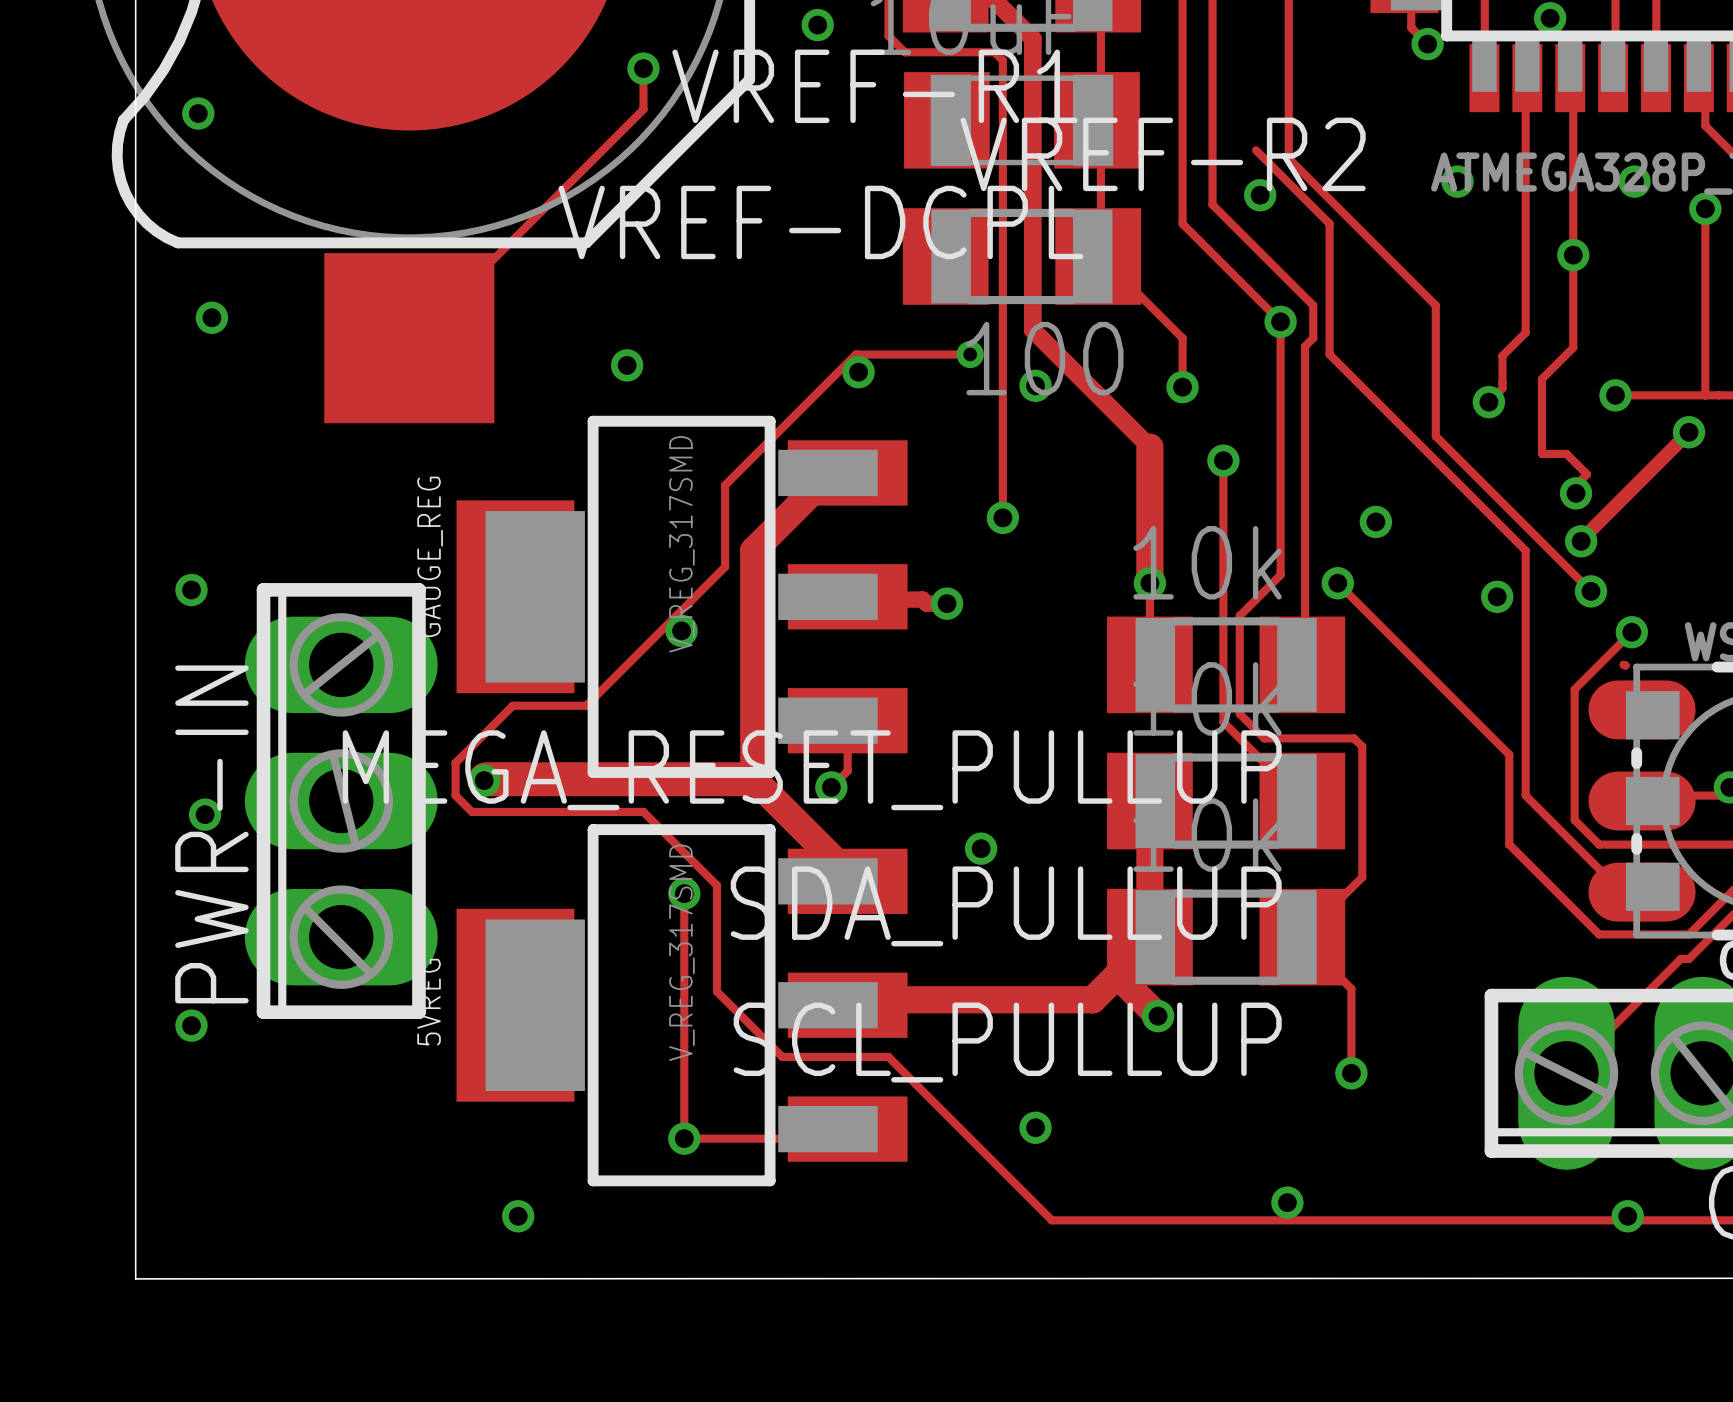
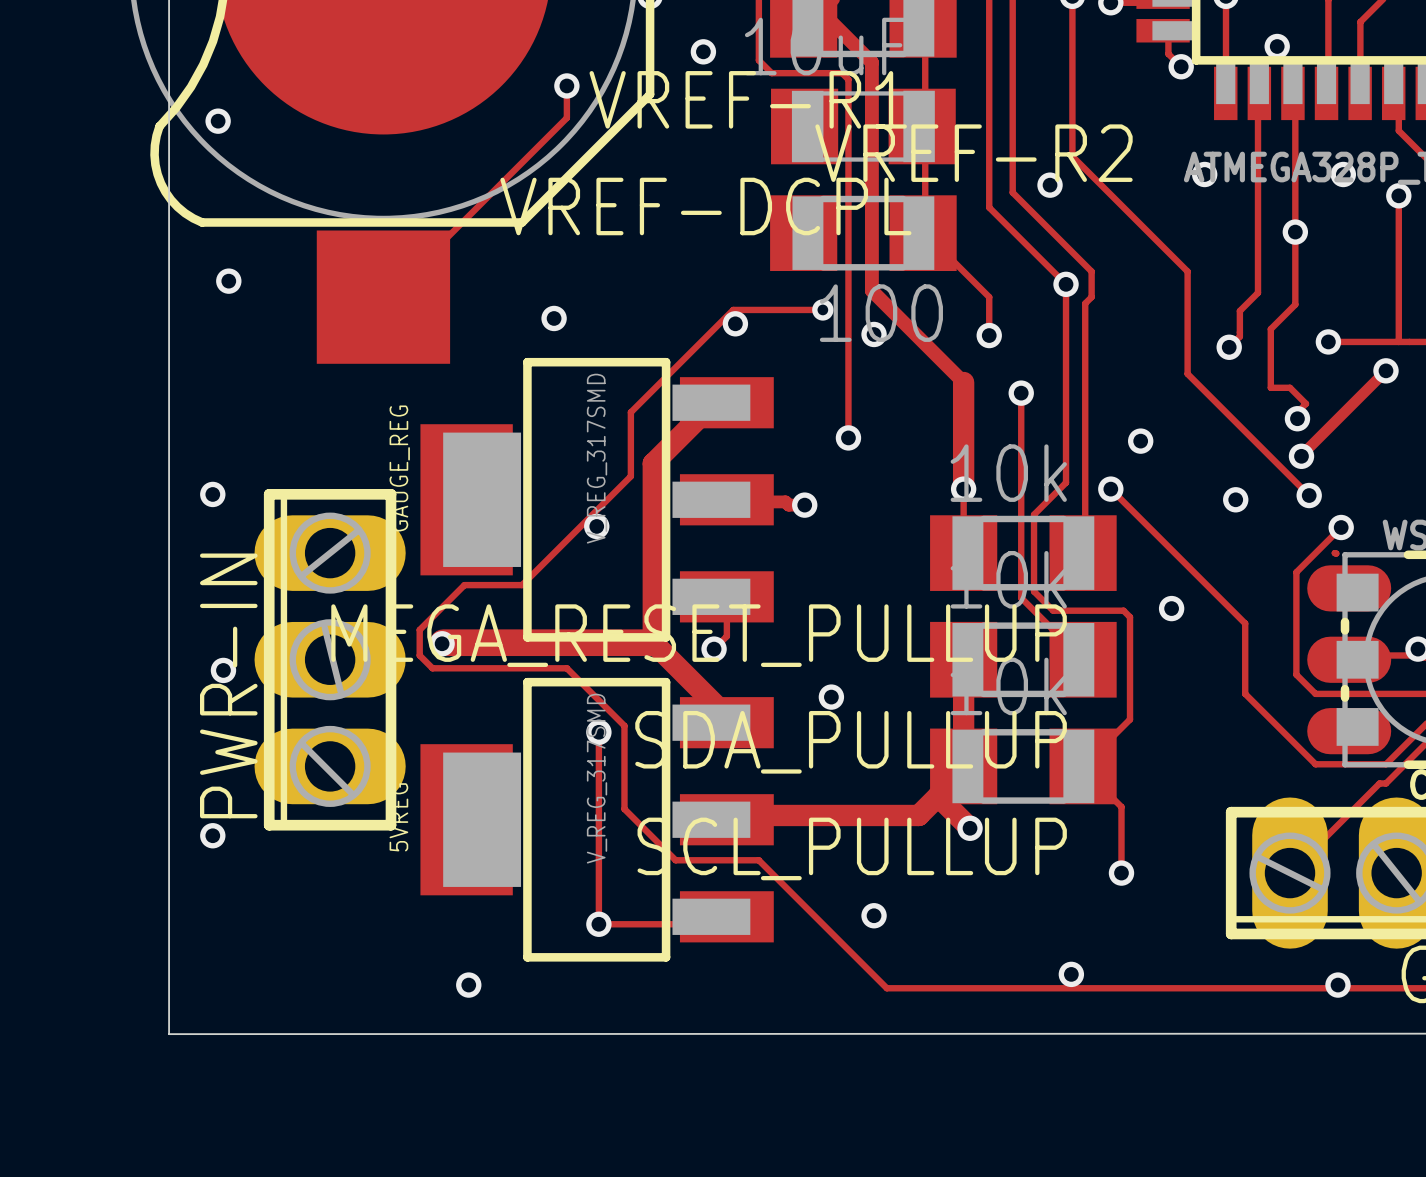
track: (1256, 150) (1329, 223) (1329, 354) (1525, 550) (1525, 795) (1615, 885) (1640, 885) -> none
via: none -> (1171, 608)

